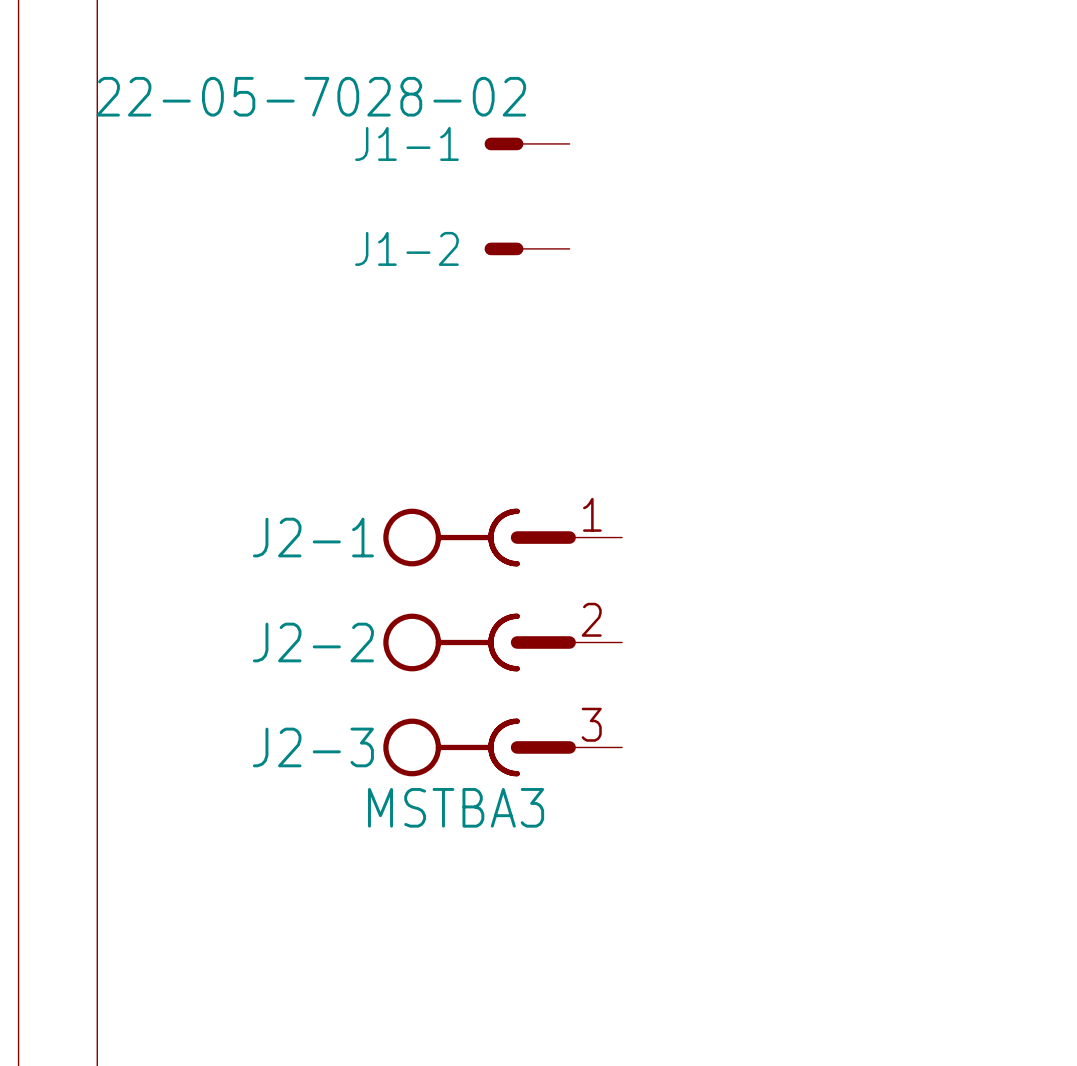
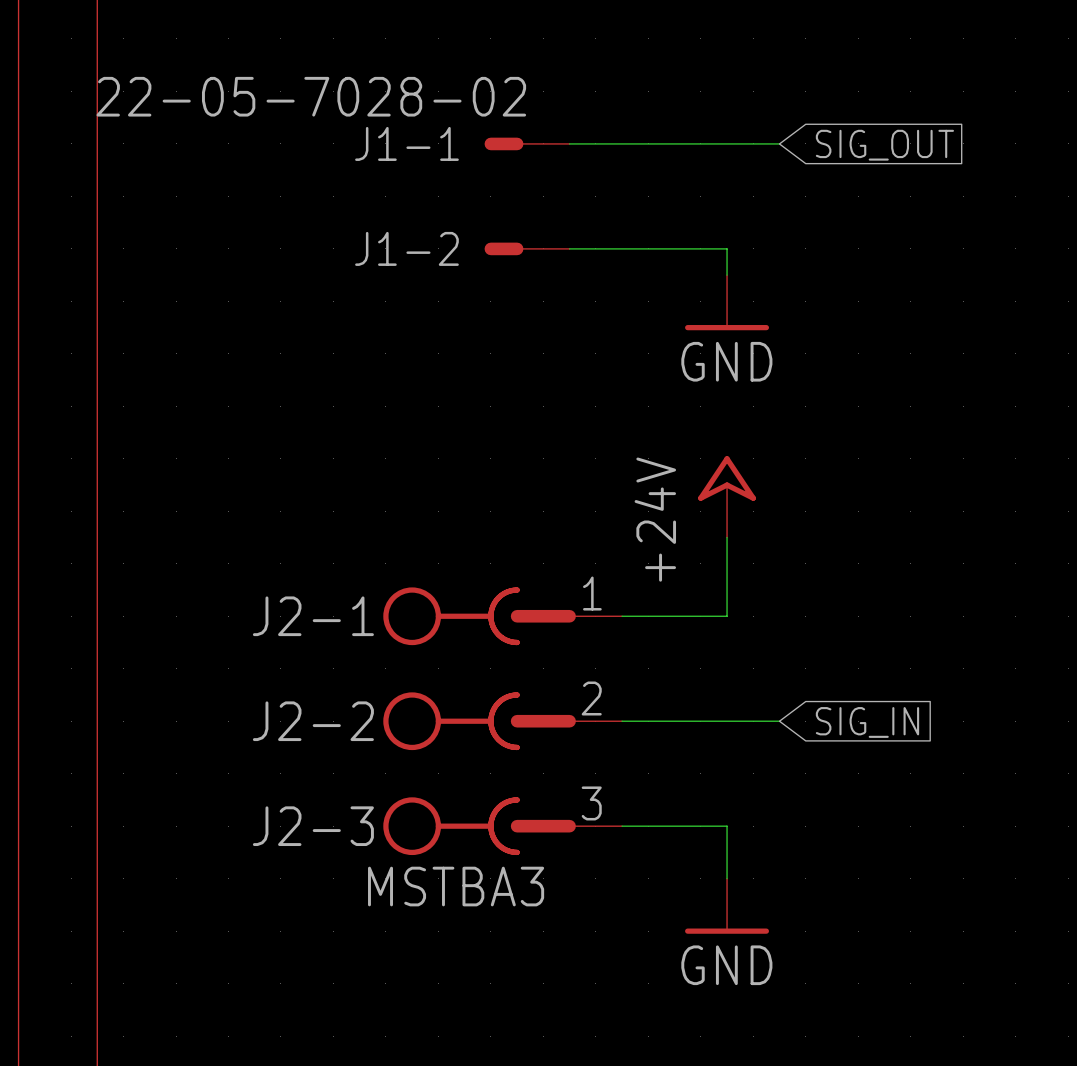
wire: none -> (569, 143) (779, 143)
global label: none -> SIG_OUT (884, 145)
wire: none -> (569, 248) (727, 248) (727, 275)
power symbol: none -> GND (727, 302)
power symbol: none -> +24V (727, 496)
J2-1 position: (502, 537) -> (502, 616)
wire: none -> (727, 537) (727, 616) (622, 616)
J2-2 position: (502, 642) -> (502, 721)
wire: none -> (622, 721) (779, 721)
global label: none -> SIG_IN (867, 722)
J2-3 position: (502, 747) -> (502, 826)
wire: none -> (622, 826) (727, 826) (727, 878)
power symbol: none -> GND (727, 906)

